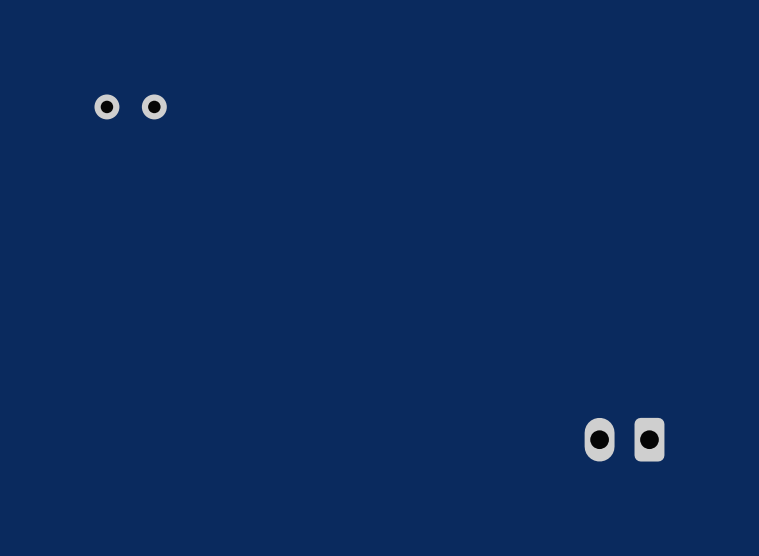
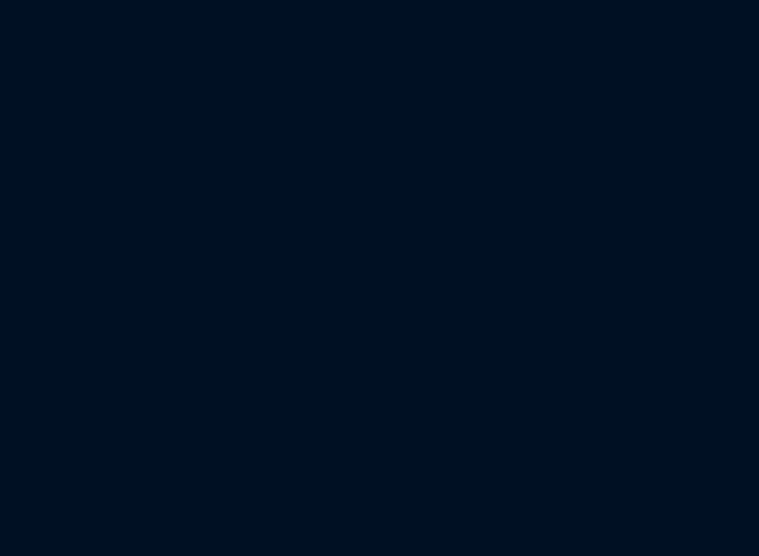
part: (130, 106) -> none
part: (624, 439) -> none

